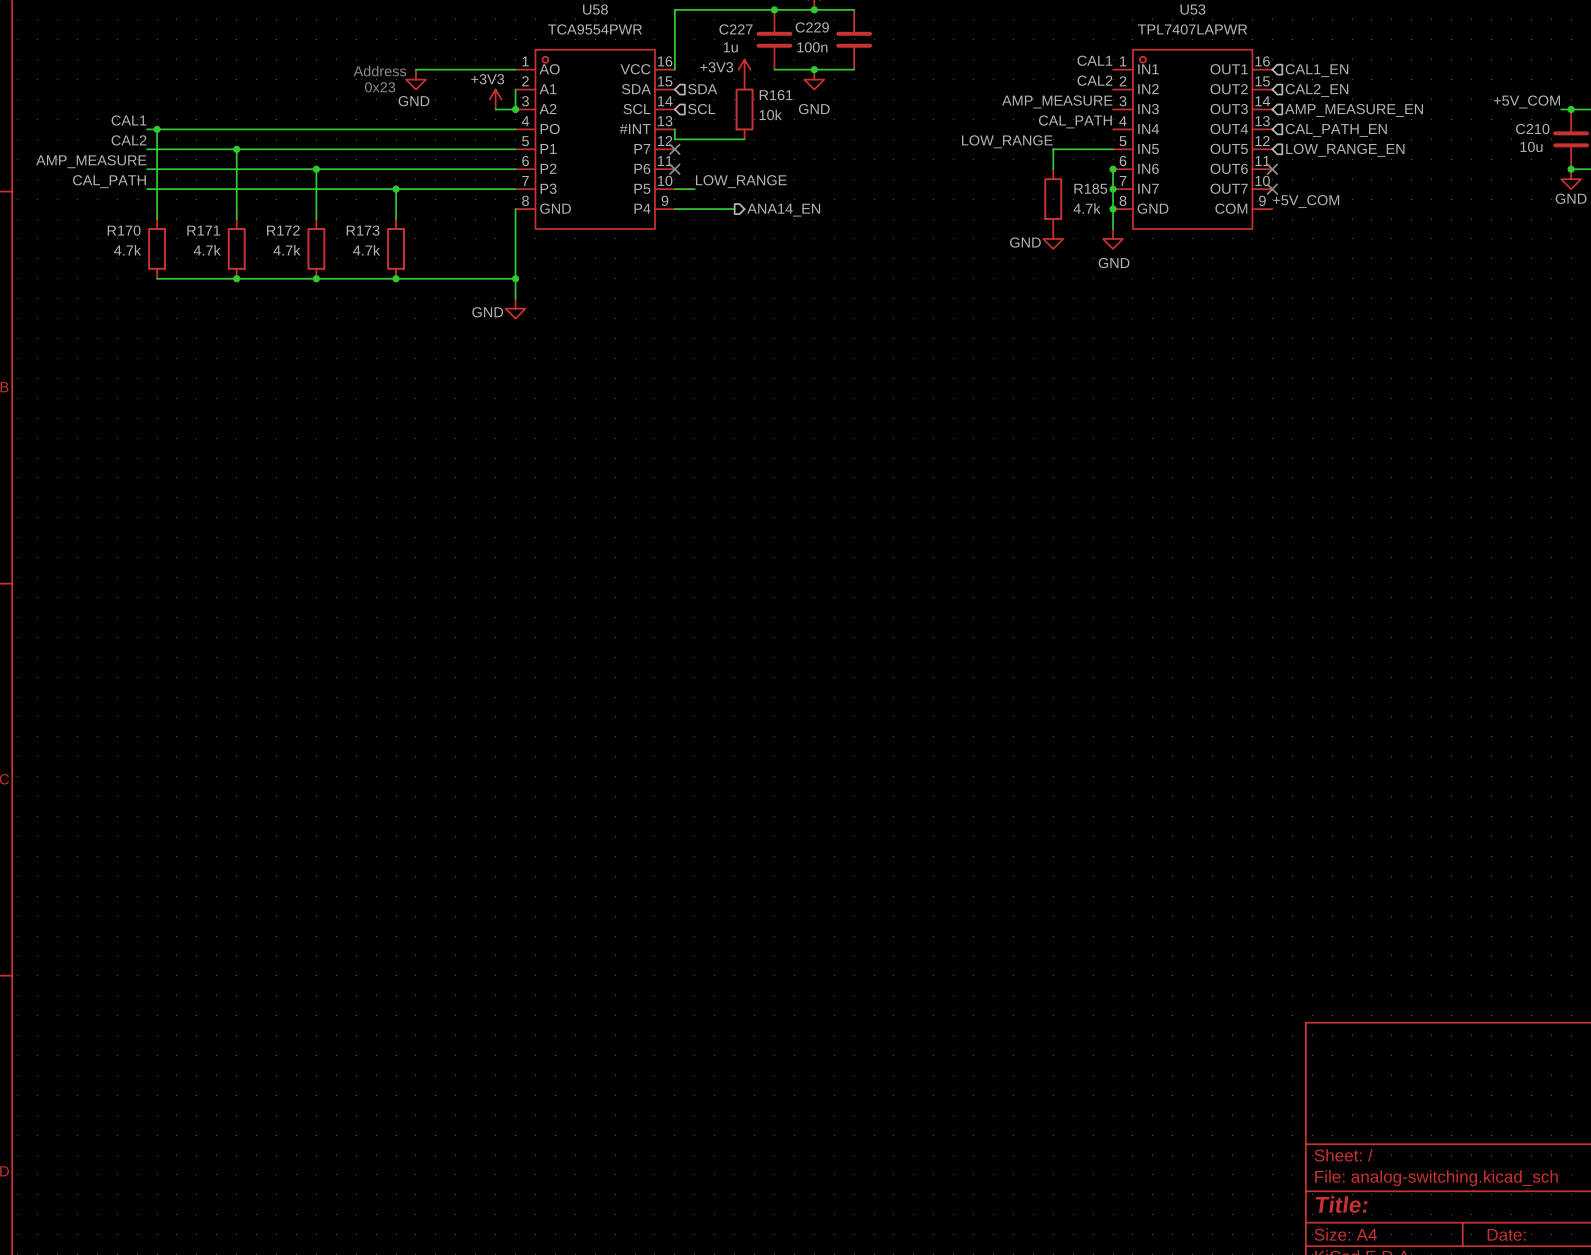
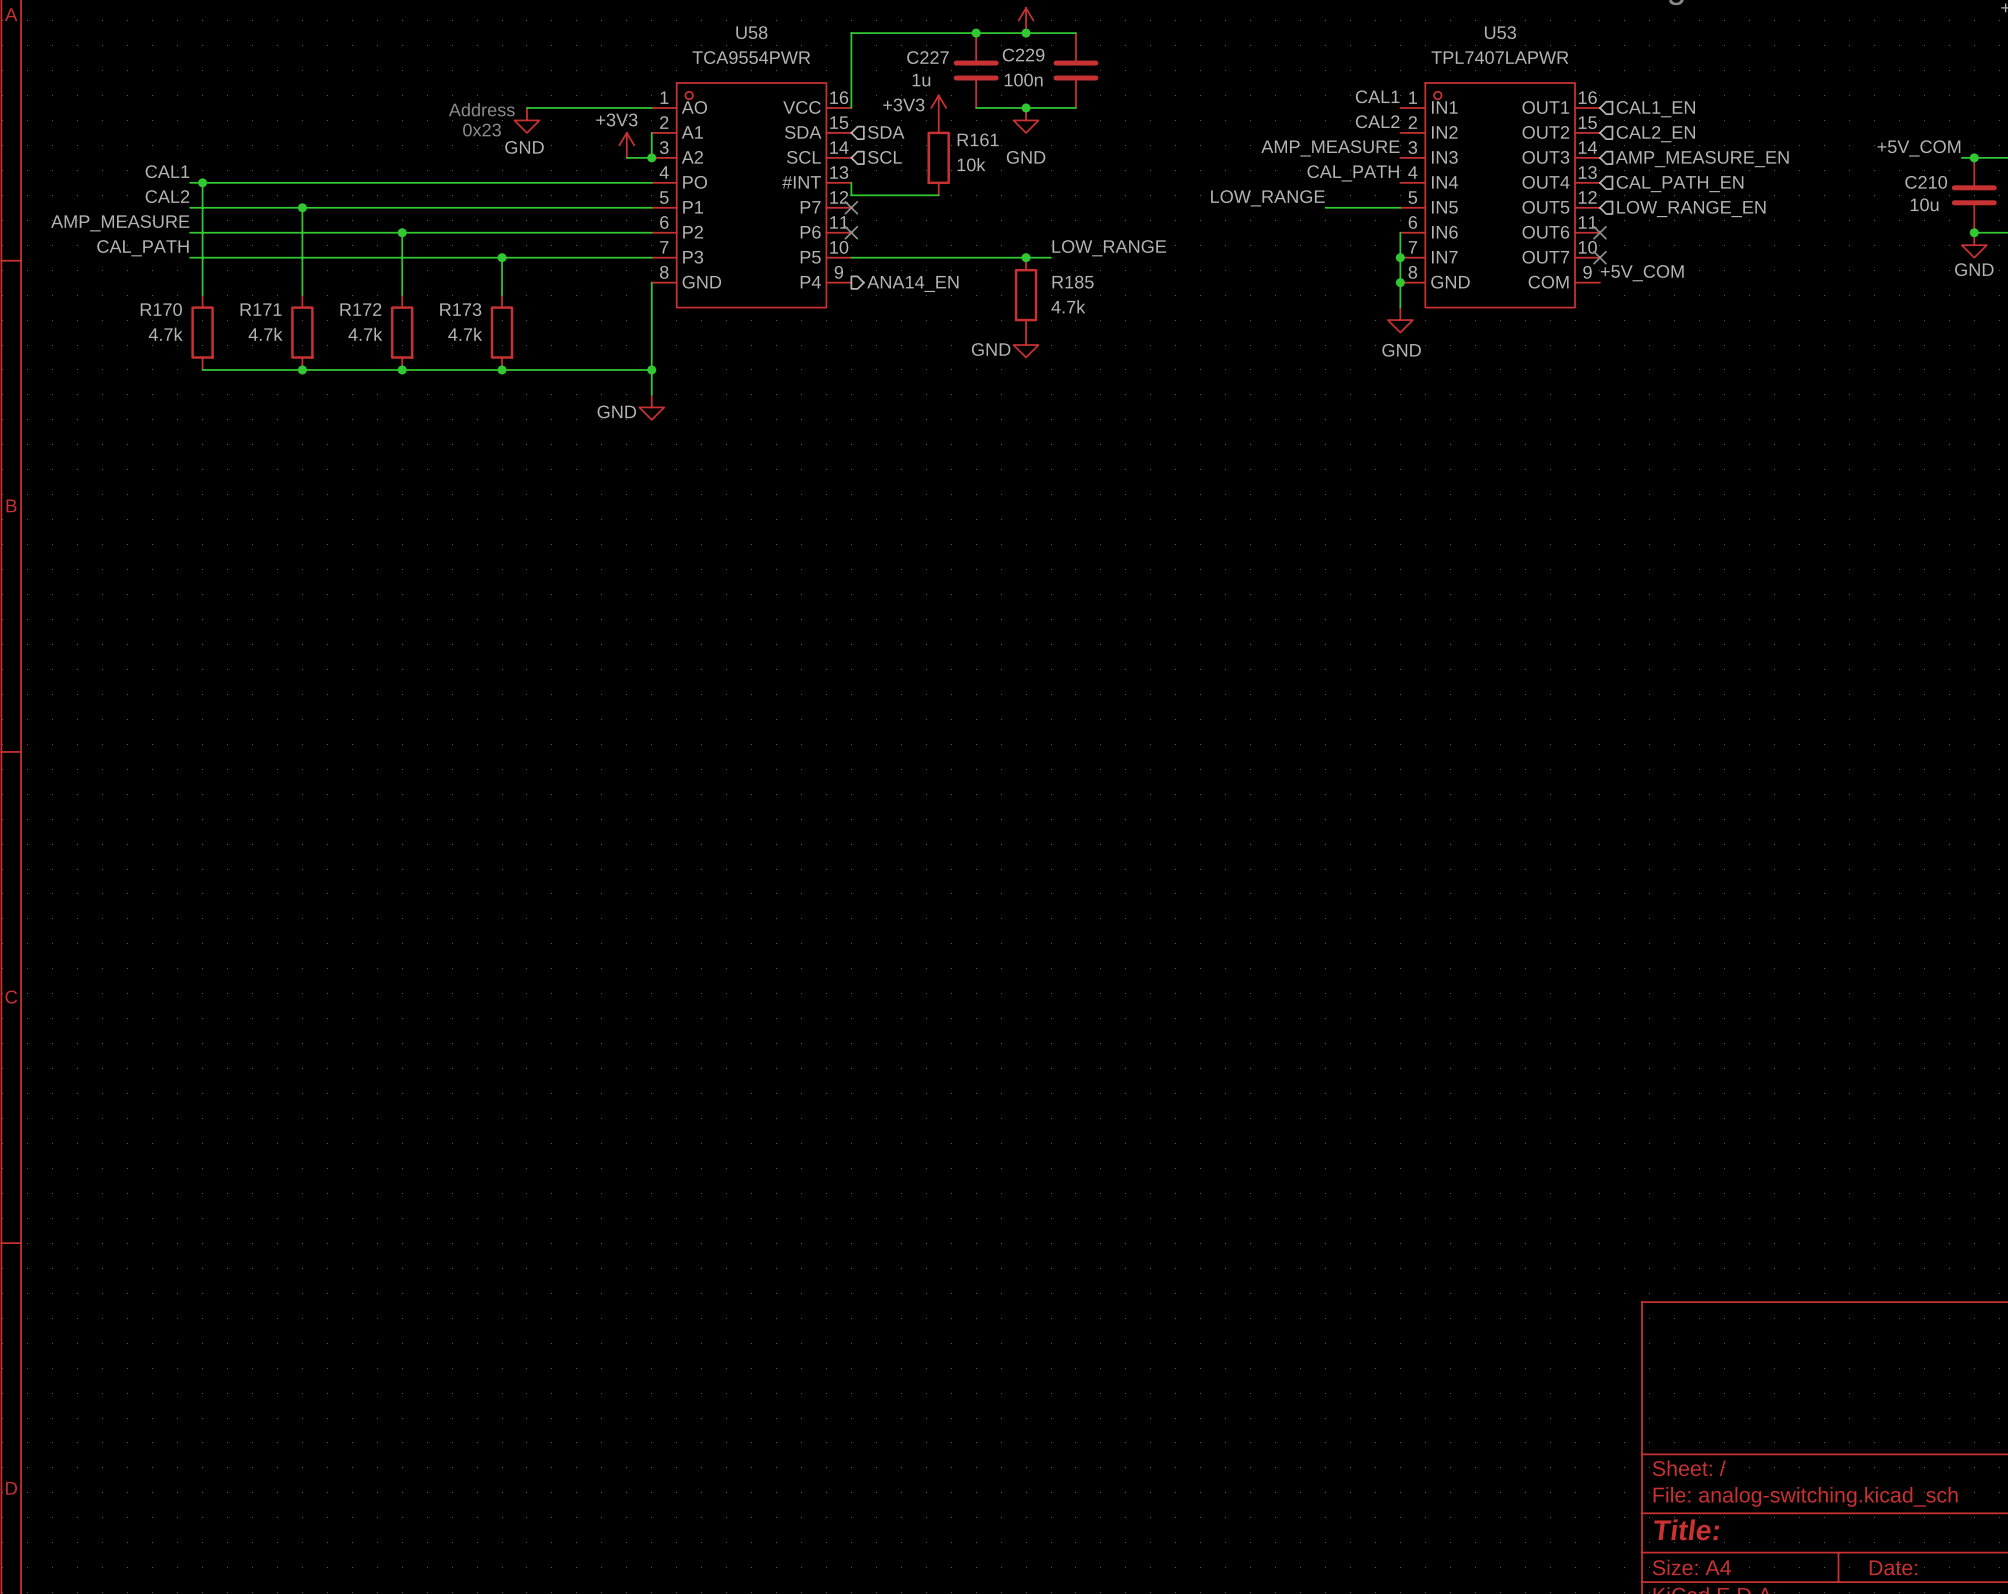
wire: (1053, 149) (1053, 169) -> none
junction: (1113, 169) -> none
label position: LOW_RANGE (741, 181) -> LOW_RANGE (1109, 248)
wire: none -> (876, 257) (1051, 257)
junction: none -> (1026, 257)
R185 position: (1053, 199) -> (1026, 295)
wire: (674, 209) (734, 209) -> none
hierarchical label position: ANA14_EN (783, 210) -> ANA14_EN (912, 283)
power symbol: GND (1053, 238) -> none
power symbol: none -> GND (1026, 345)

